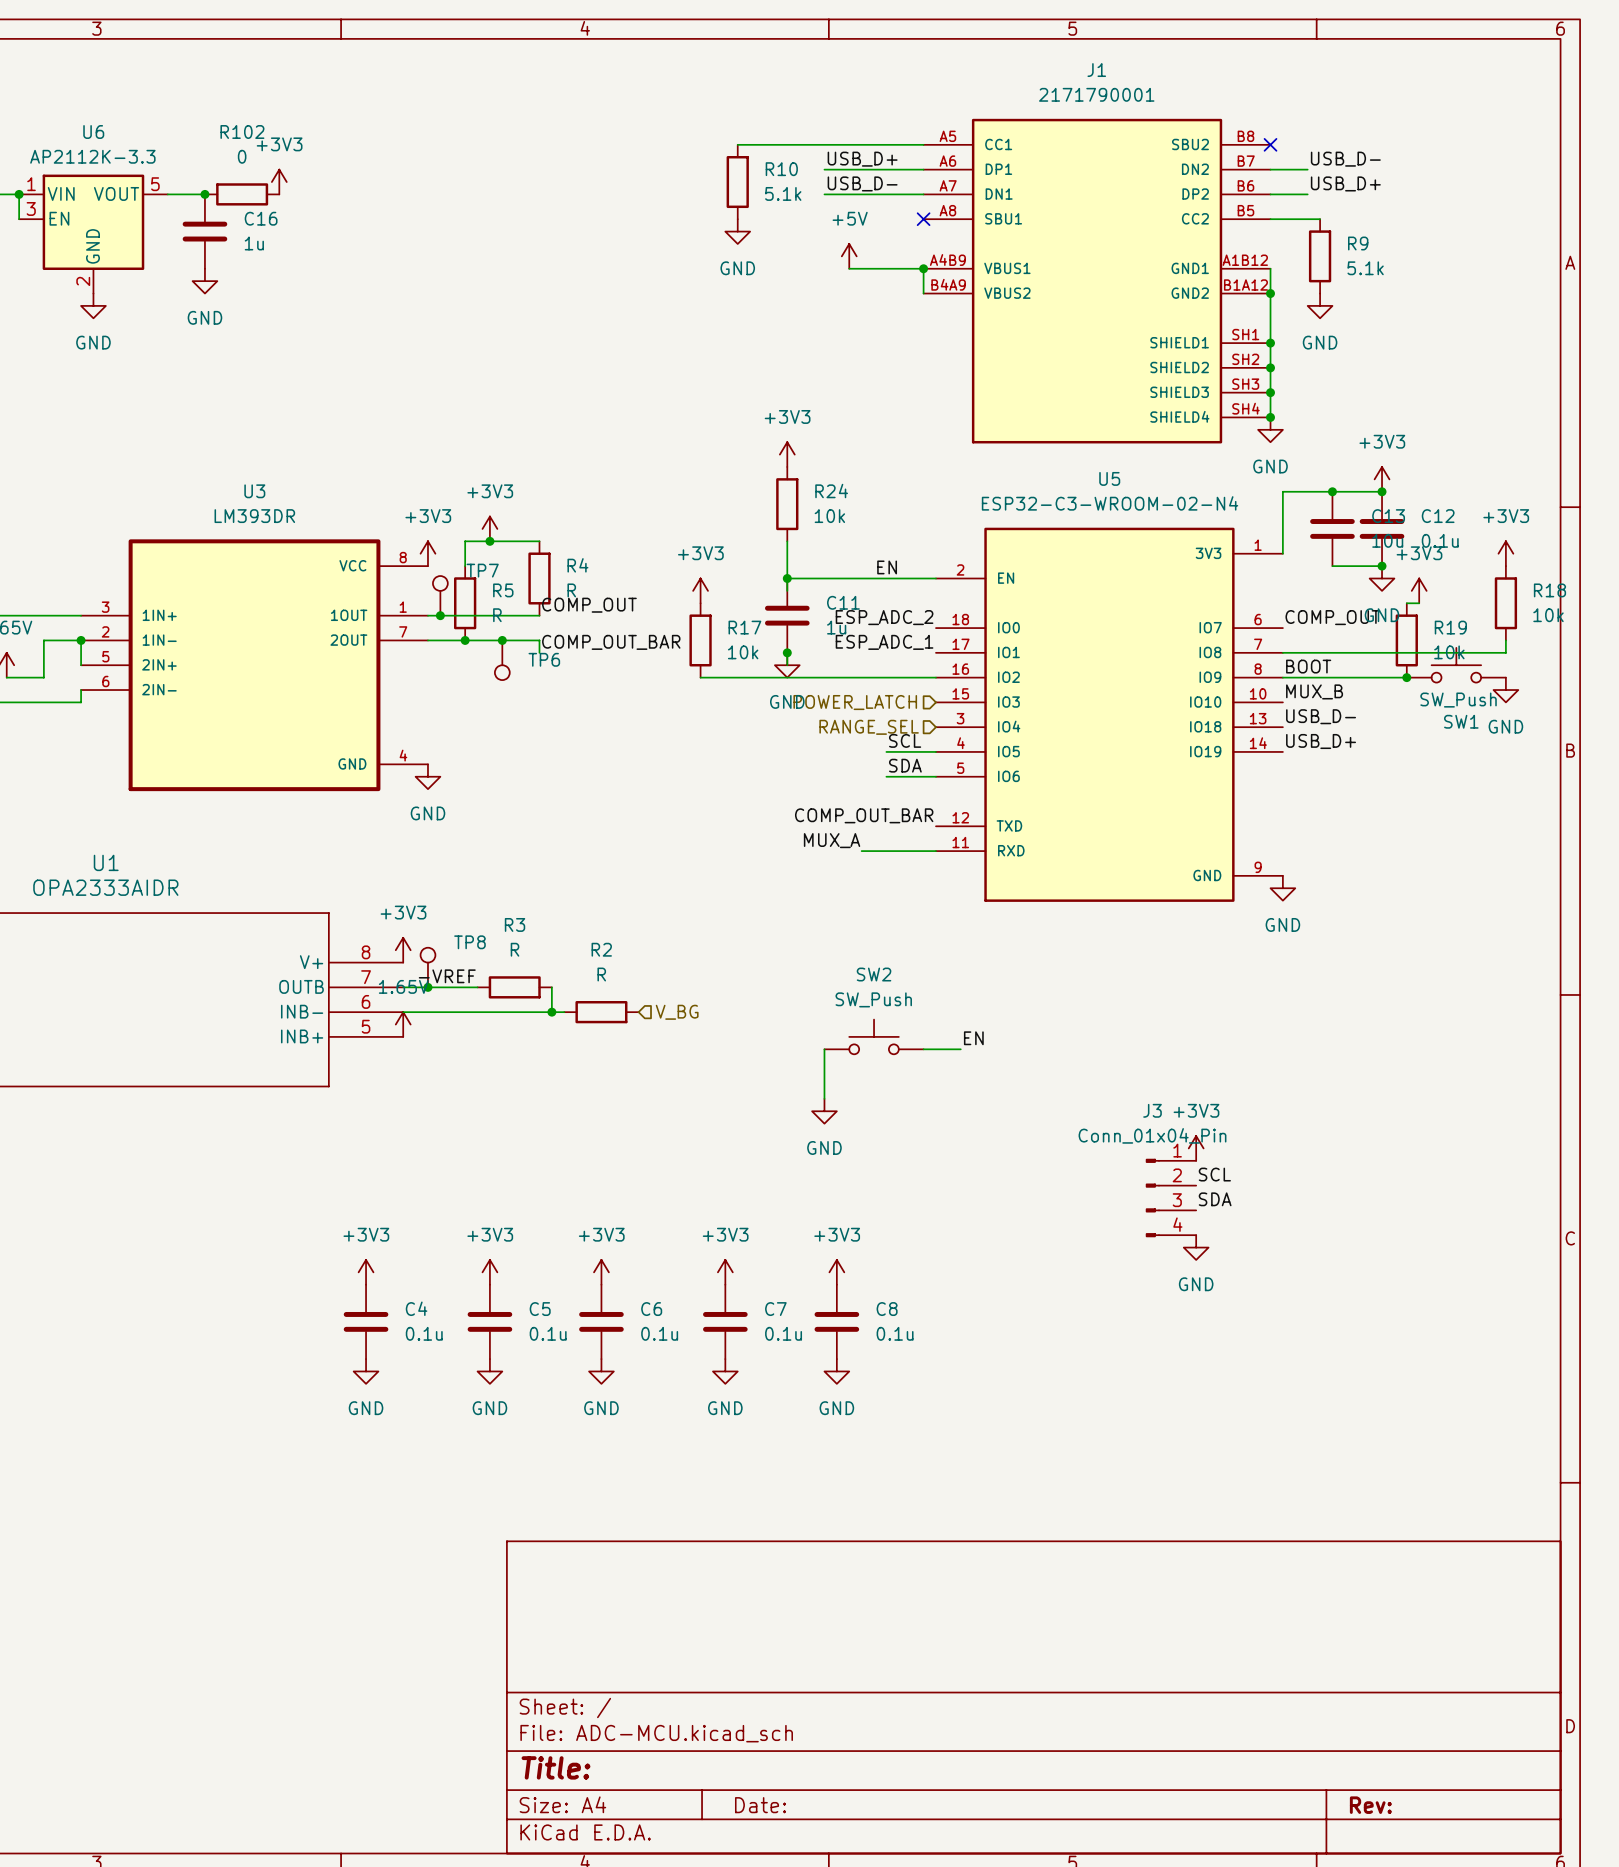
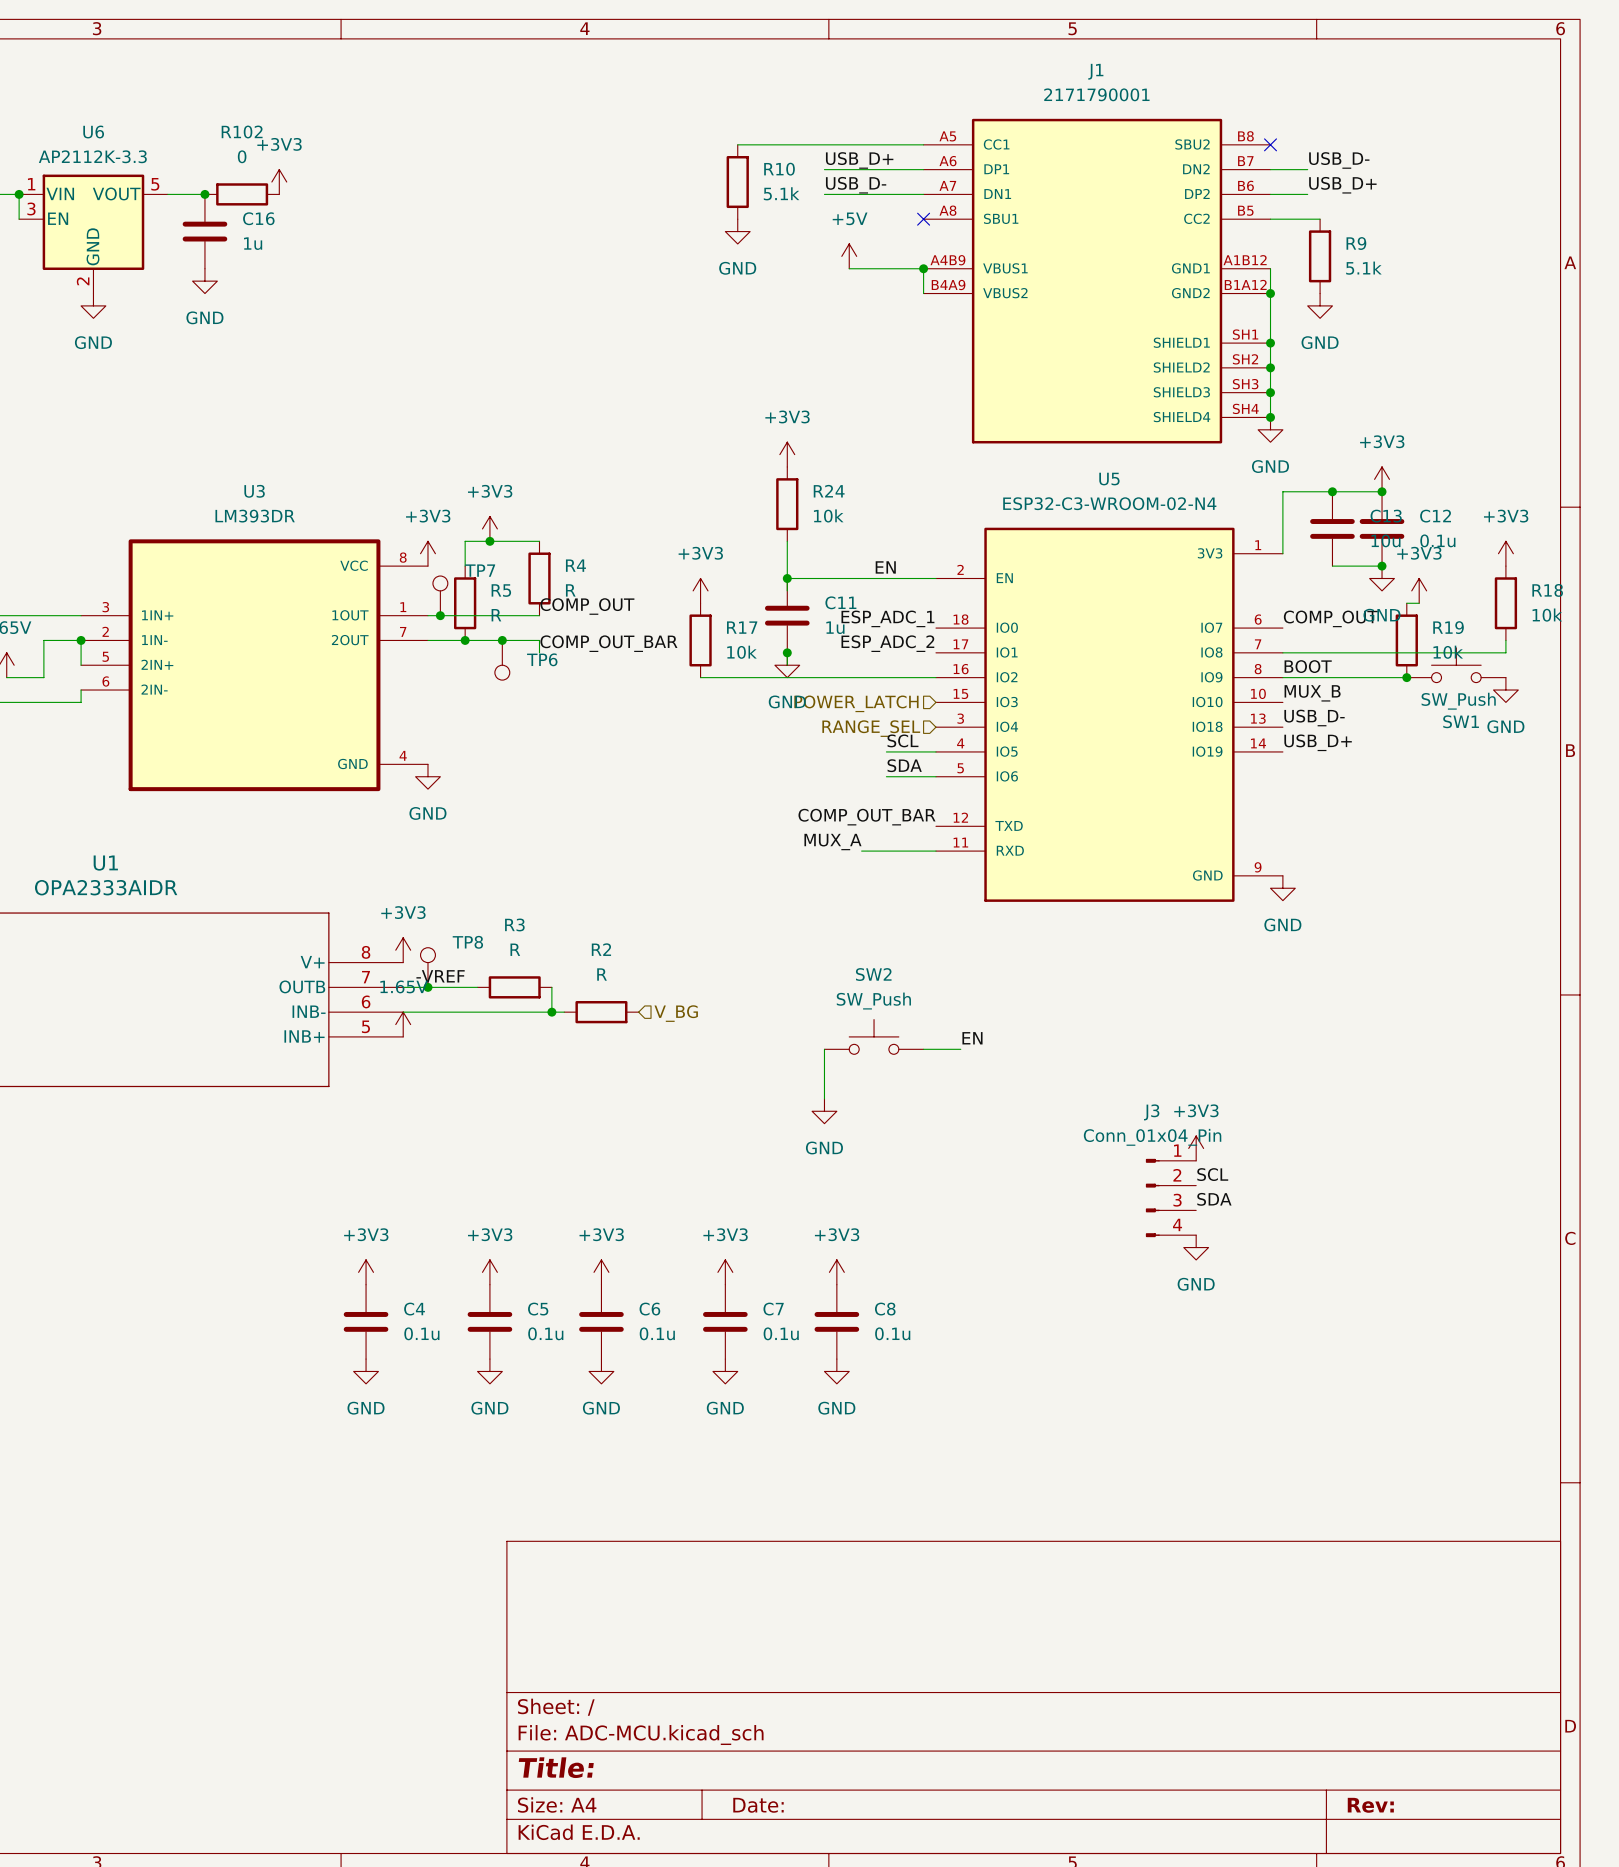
label: ESP_ADC_2 (884, 617) -> ESP_ADC_1 (887, 618)
label: ESP_ADC_1 (884, 642) -> ESP_ADC_2 (887, 643)

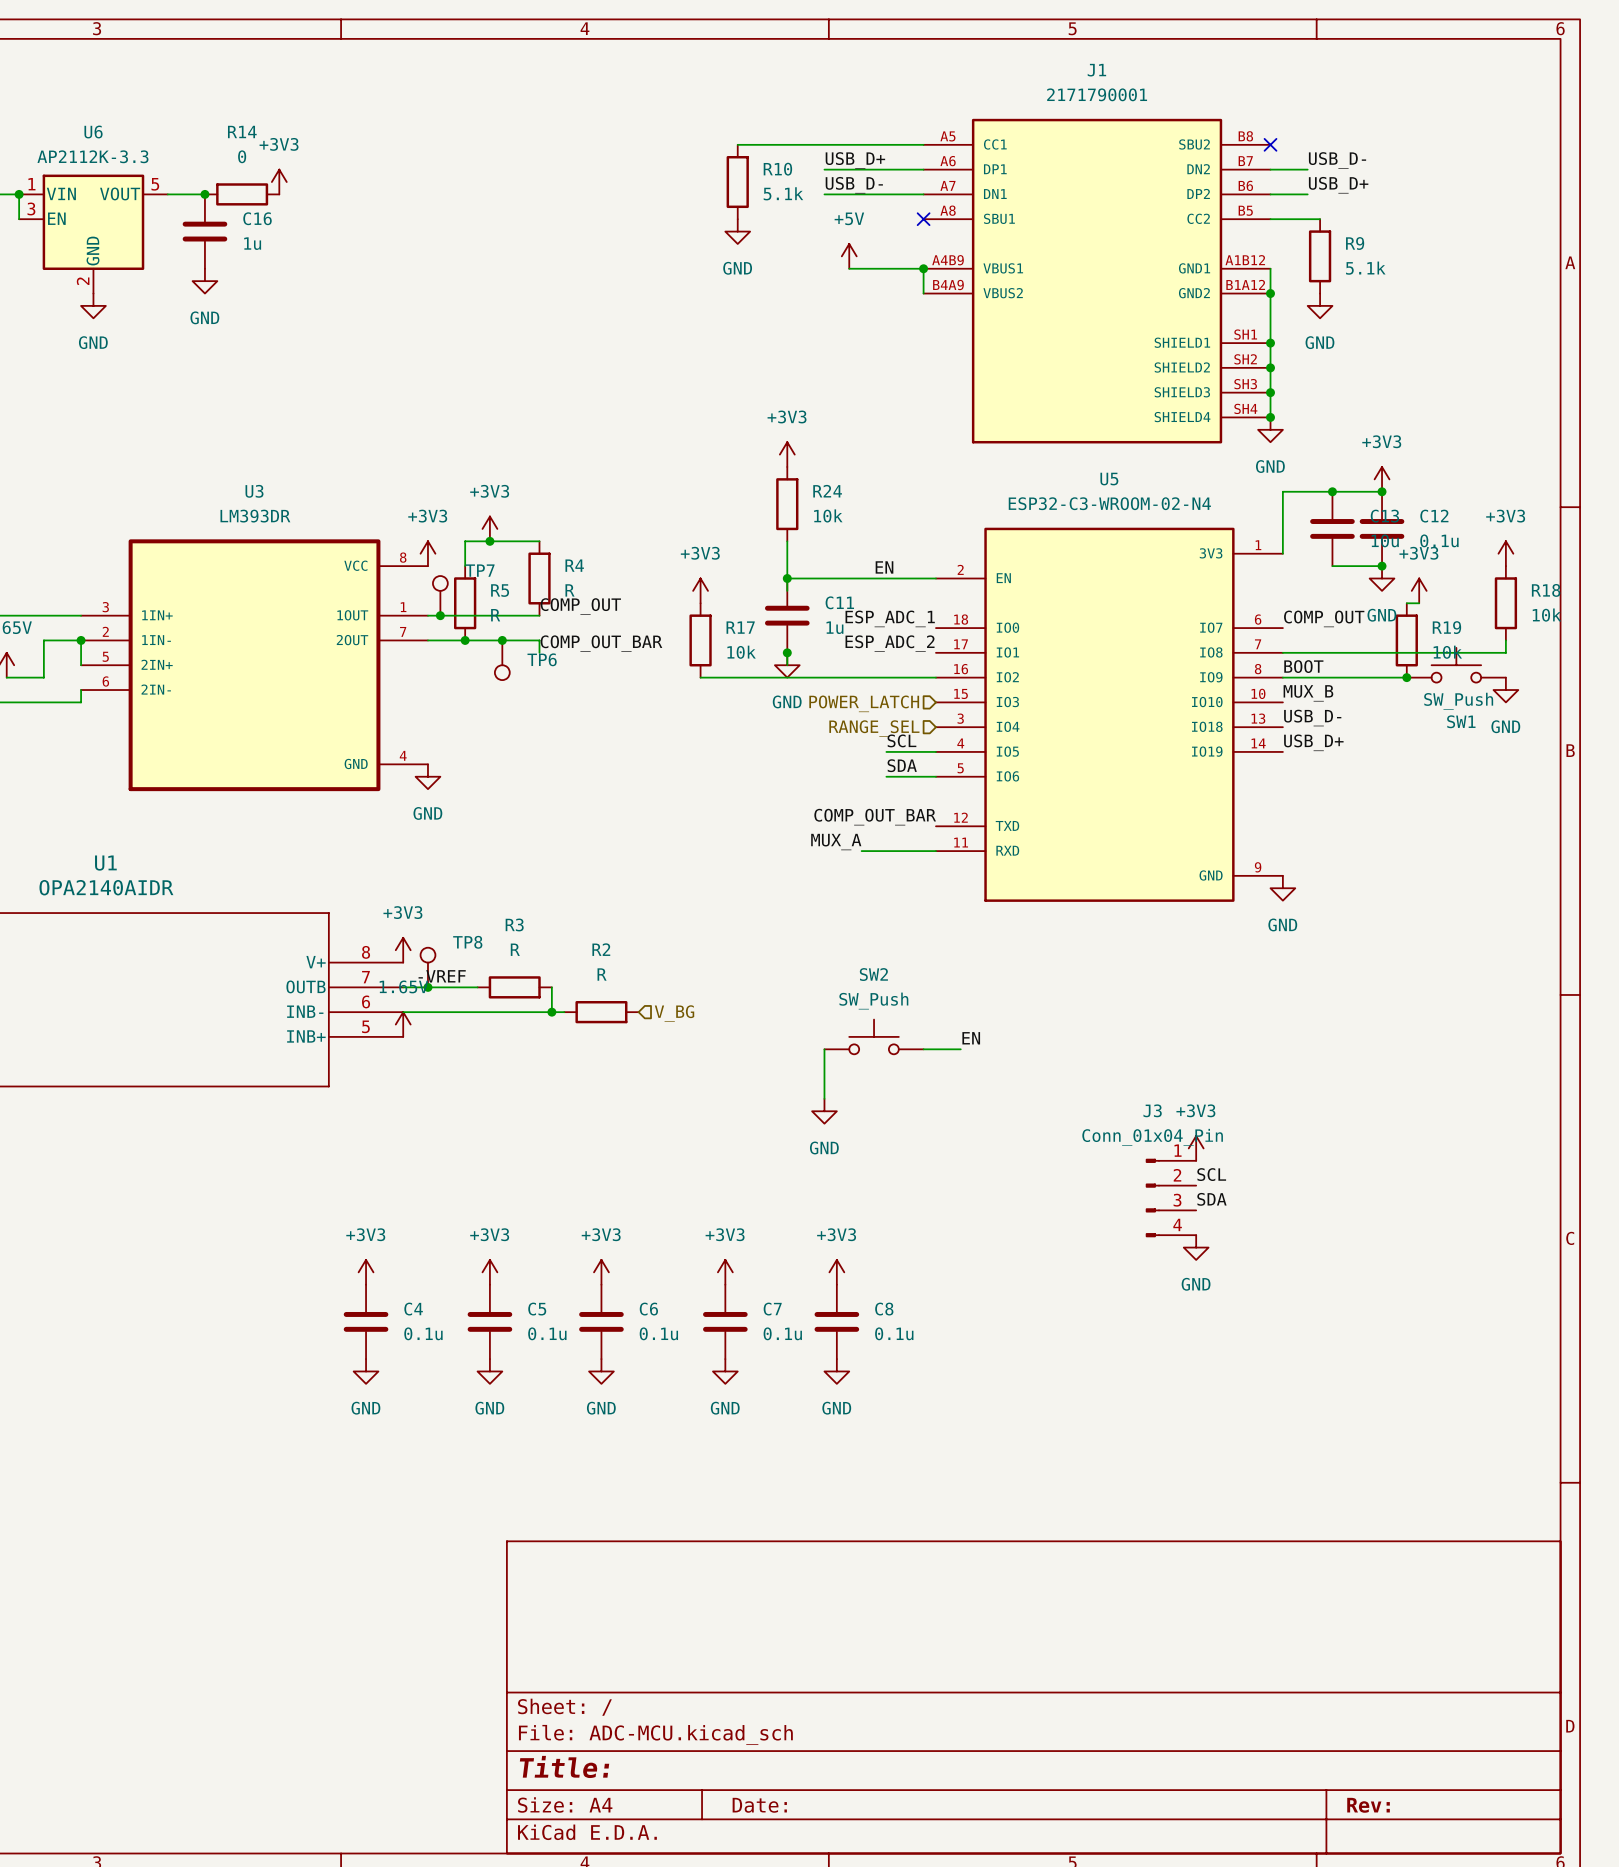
R102 name: R102 (242, 132) -> R14 (242, 131)
U1 value: OPA2333AIDR (106, 887) -> OPA2140AIDR (106, 887)

